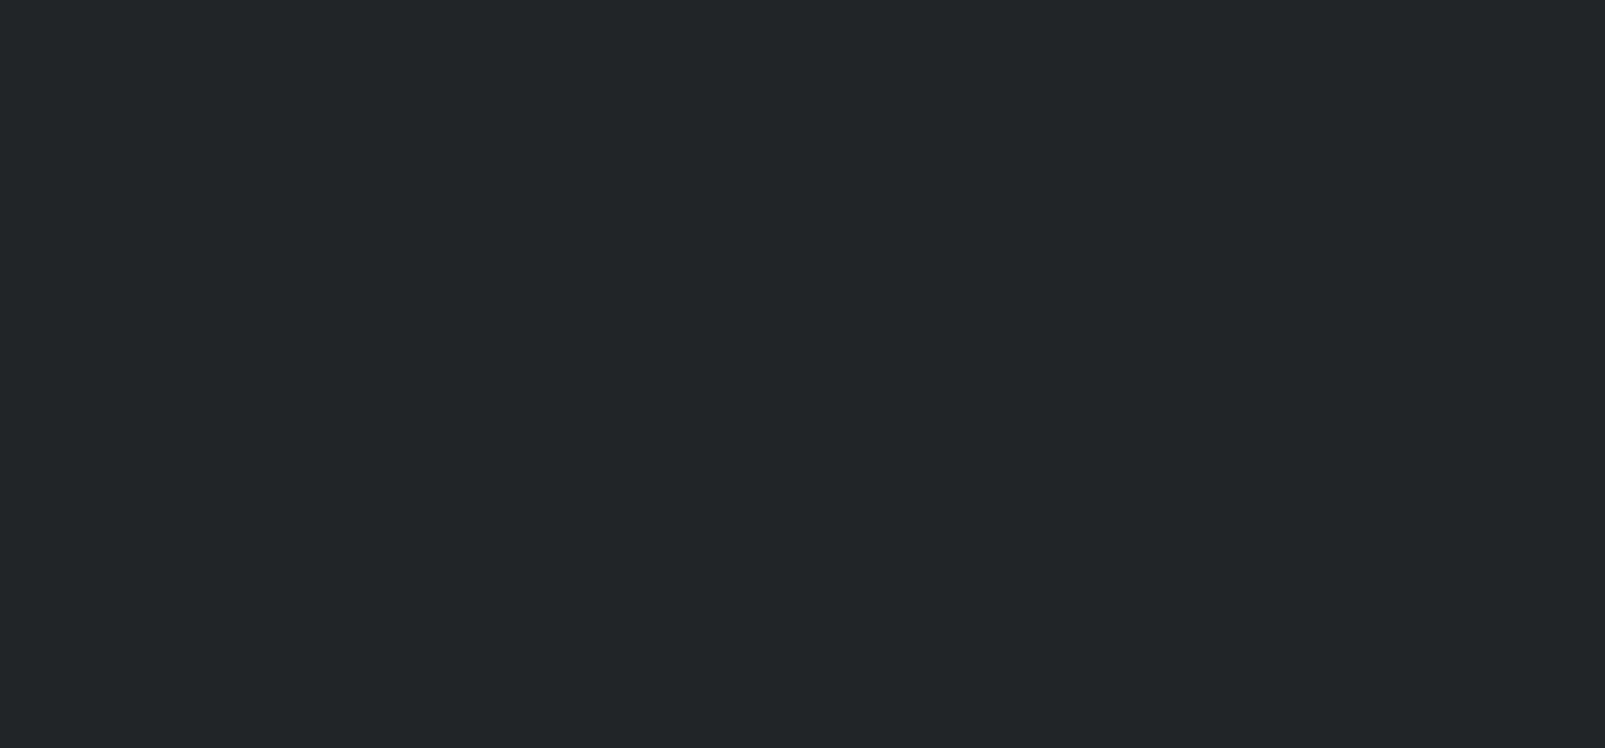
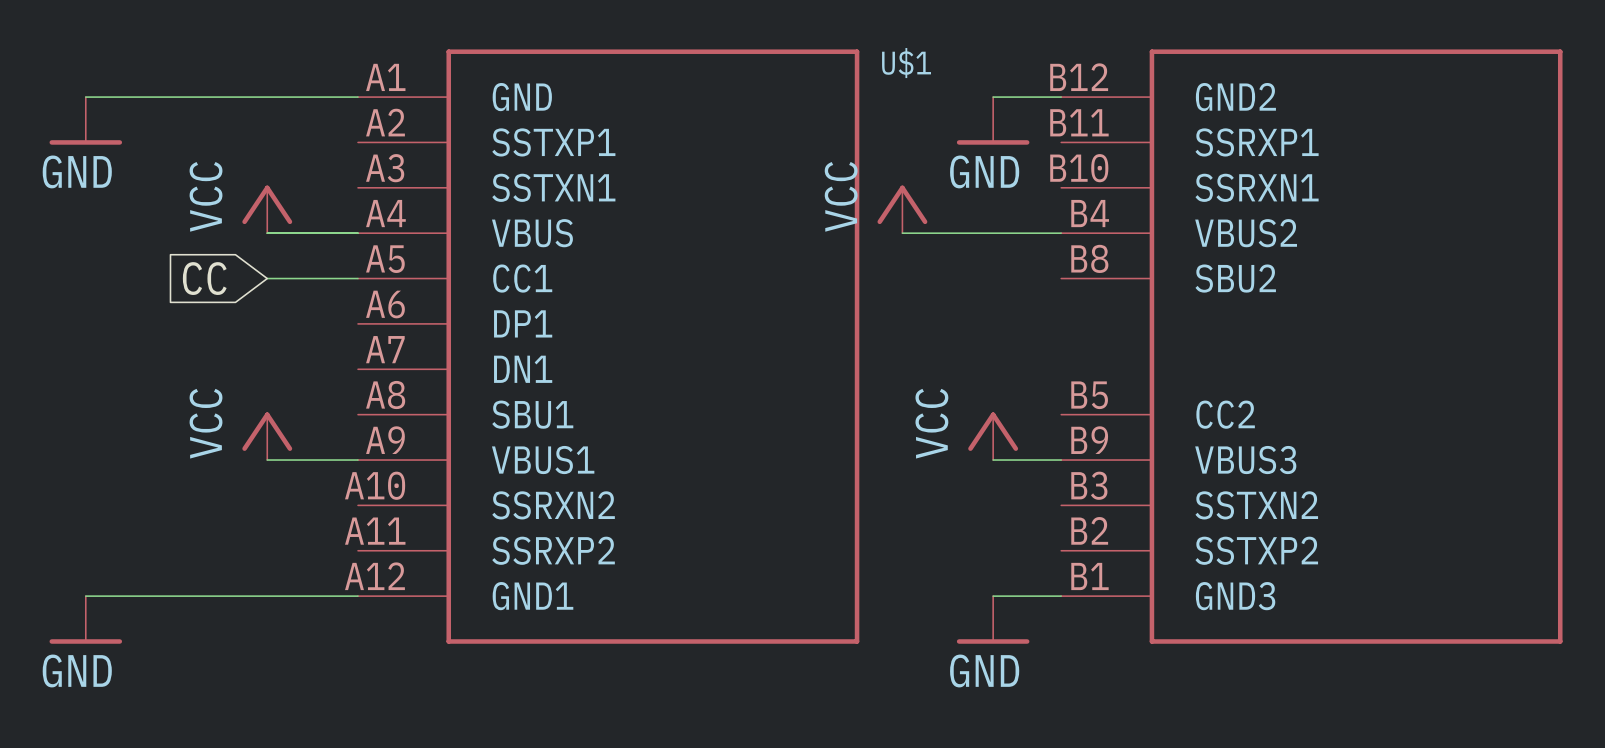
wire: none -> (85, 97) (357, 97)
wire: none -> (993, 97) (1061, 97)
power symbol: none -> GND (85, 120)
power symbol: none -> GND (993, 120)
power symbol: none -> VCC (267, 209)
power symbol: none -> VCC (902, 209)
wire: none -> (267, 233) (357, 233)
wire: none -> (902, 233) (1061, 233)
global label: none -> CC (204, 278)
wire: none -> (267, 278) (357, 278)
U$1: none -> (960, 346)
power symbol: none -> VCC (267, 436)
power symbol: none -> VCC (993, 436)
wire: none -> (267, 460) (357, 460)
wire: none -> (993, 460) (1061, 460)
wire: none -> (85, 596) (357, 596)
wire: none -> (993, 596) (1061, 596)
power symbol: none -> GND (85, 619)
power symbol: none -> GND (993, 619)

